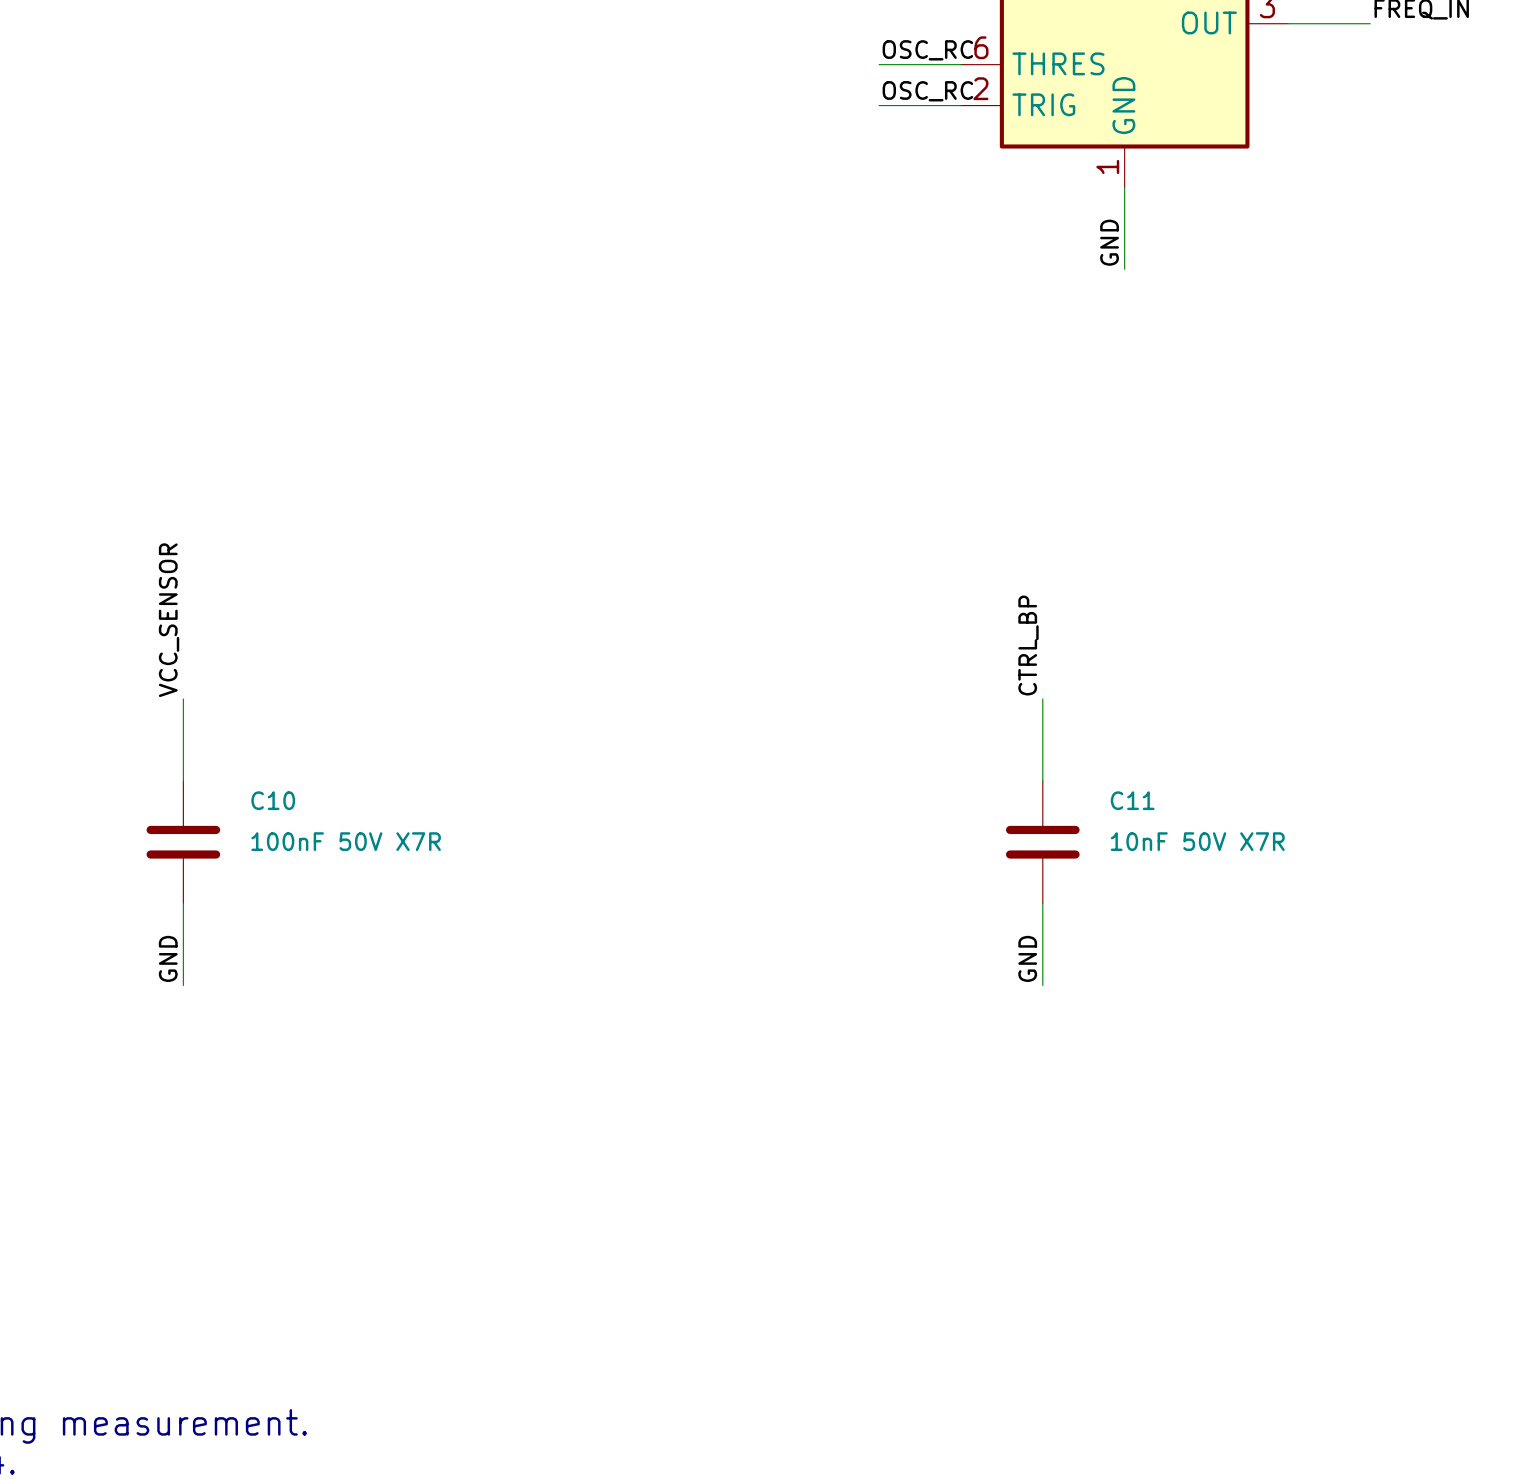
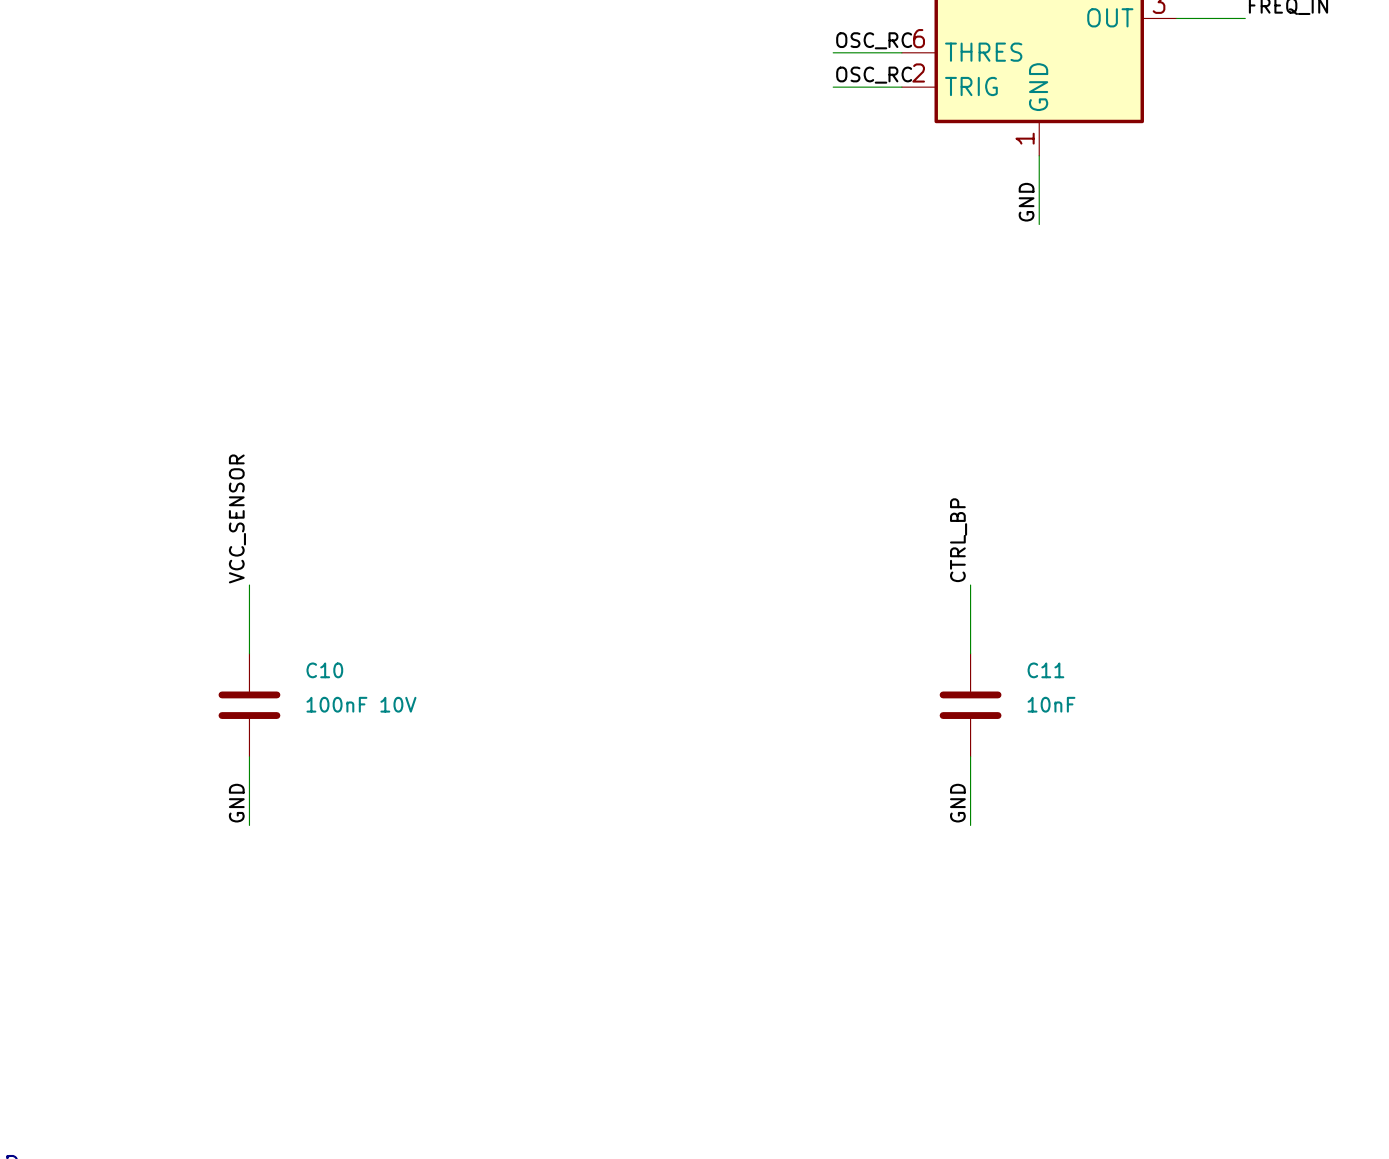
C10 value: 100nF 50V X7R (346, 841) -> 100nF 10V (361, 704)
C11 value: 10nF 50V X7R (1197, 841) -> 10nF (1051, 704)

